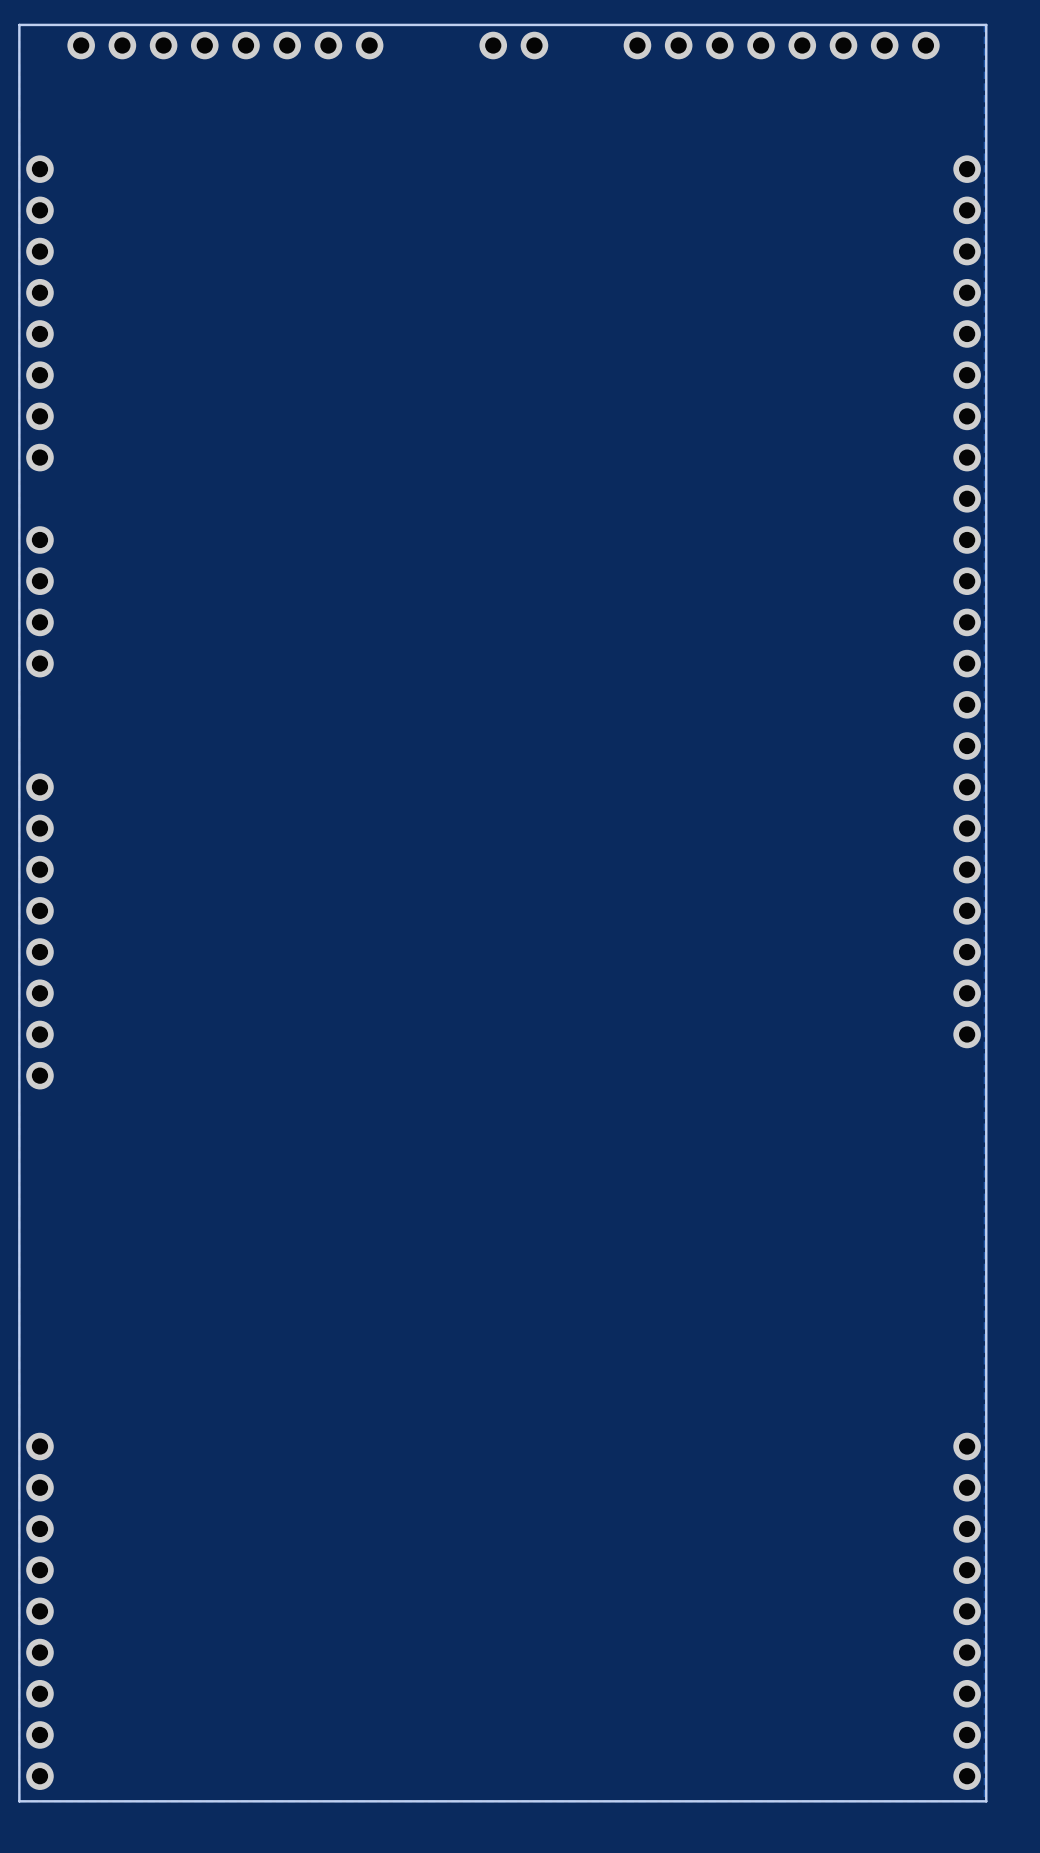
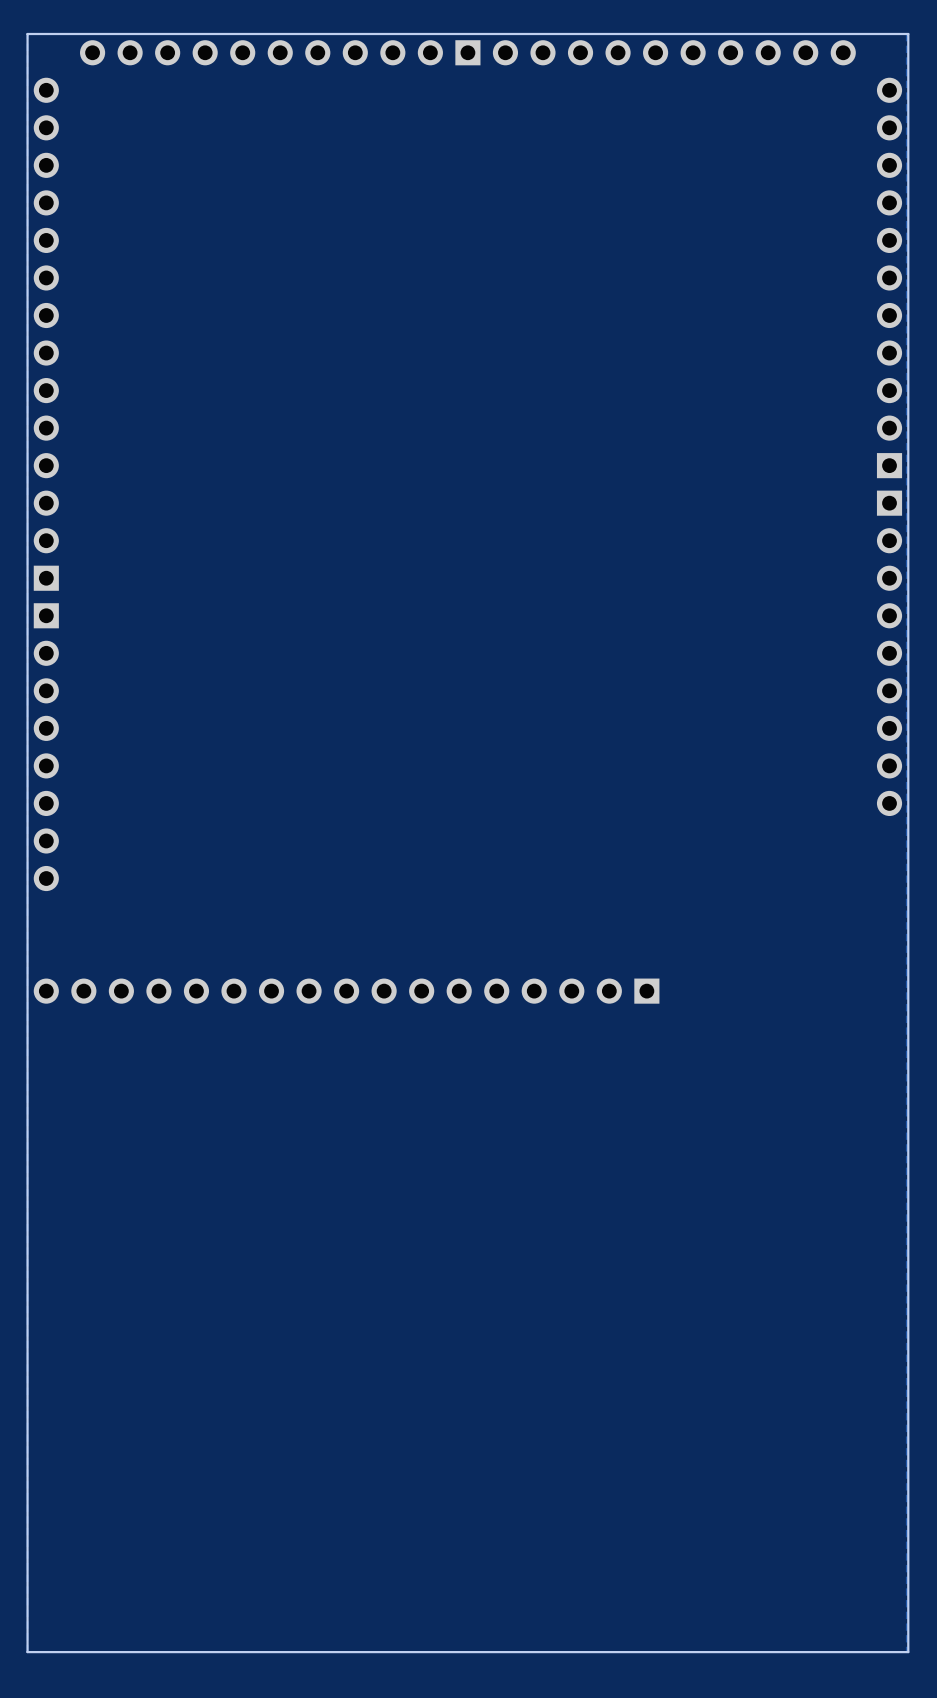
part footprint: [479, 31, 549, 60] -> [80, 40, 856, 66]
part: (225, 45) -> none
part: (781, 45) -> none
part: (967, 313) -> none
part: none -> (889, 446)
part: none -> (46, 484)
part: (967, 560) -> none
part: (39, 601) -> none
part: (967, 725) -> none
part: (39, 931) -> none
part: (967, 931) -> none
part: none -> (346, 991)
part: (39, 1611) -> none
part: (967, 1611) -> none

